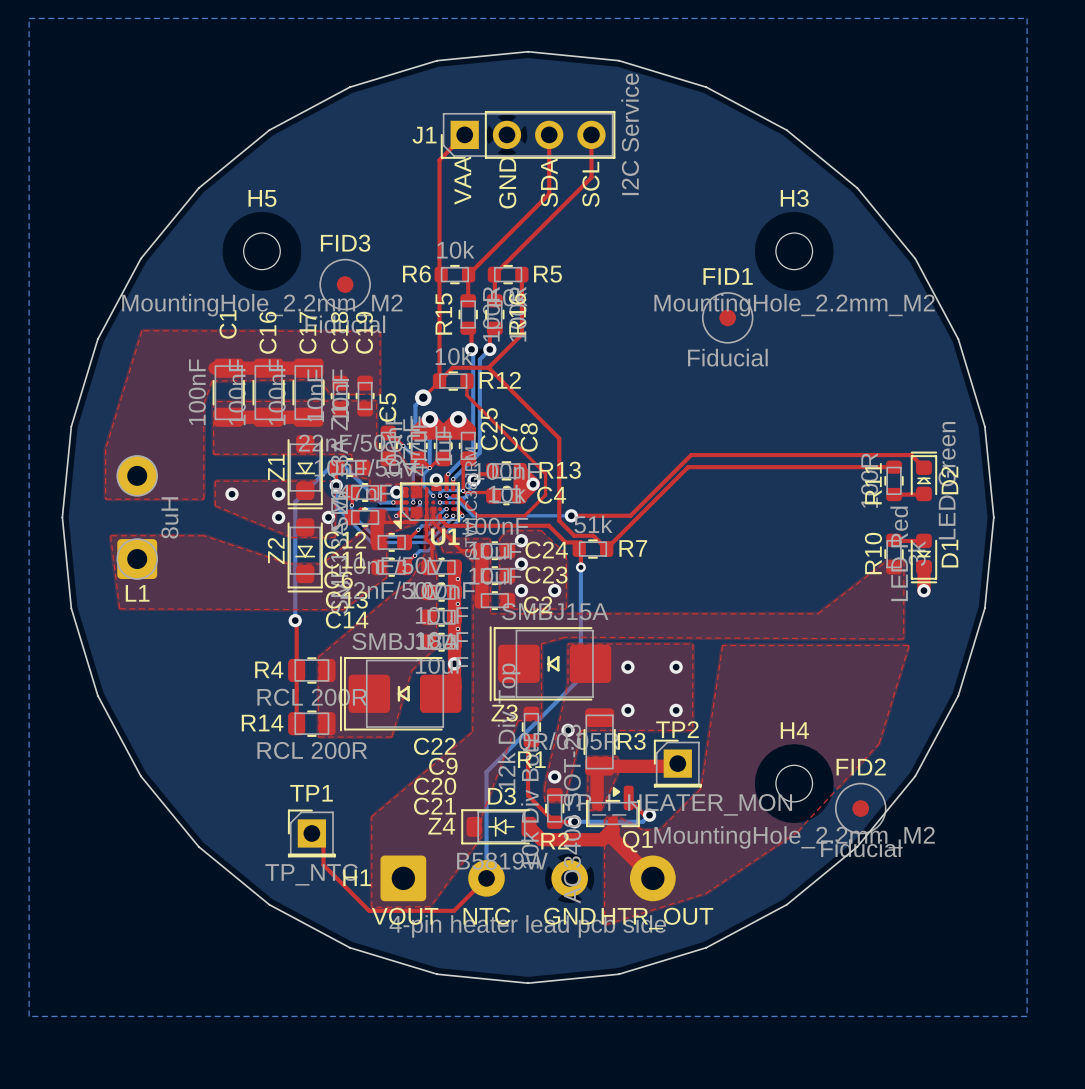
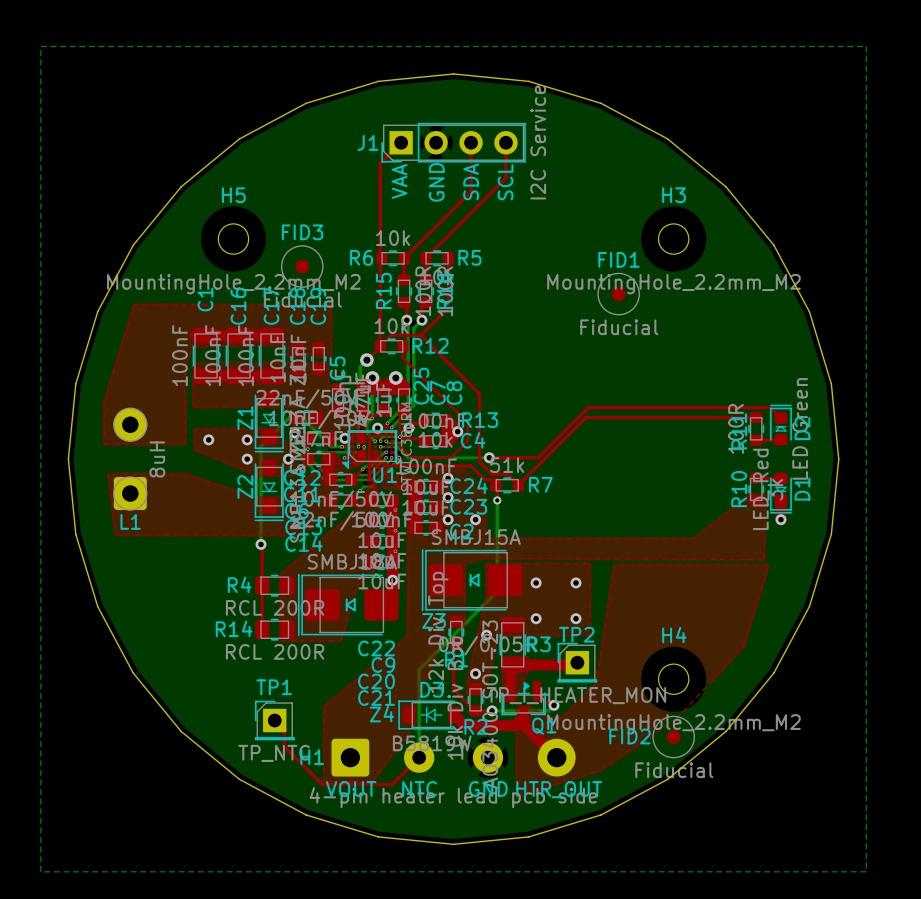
FID2 name position: FID2 (861, 767) -> FID2 (629, 736)
FID2 position: (860, 808) -> (673, 737)

